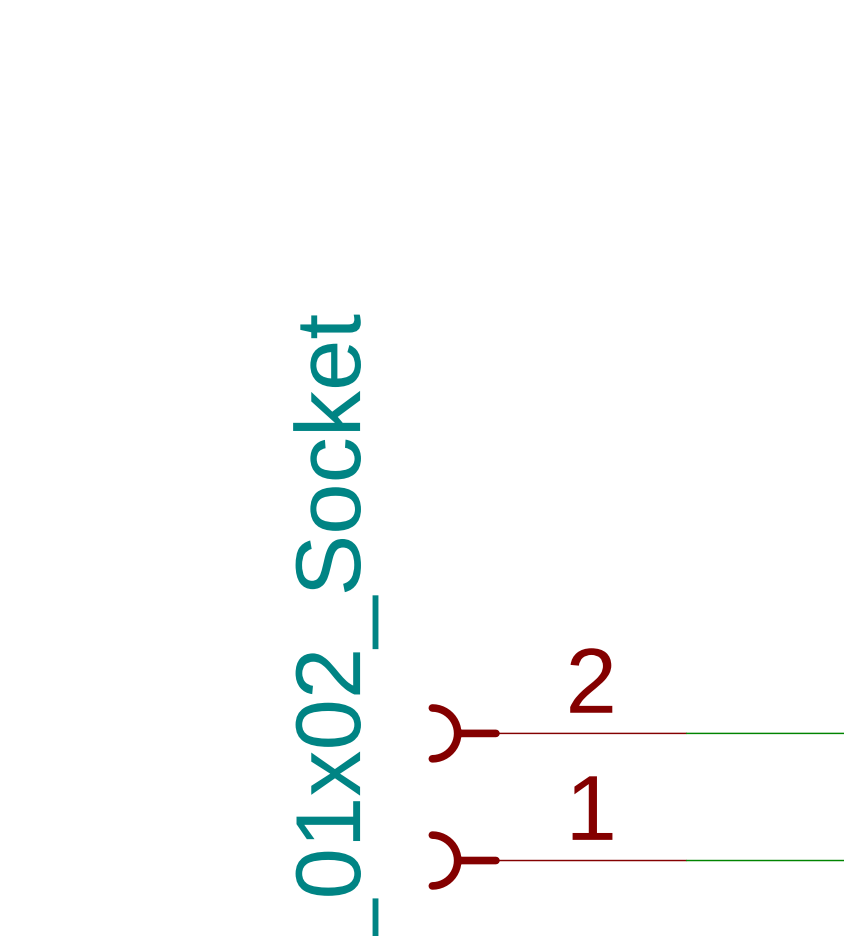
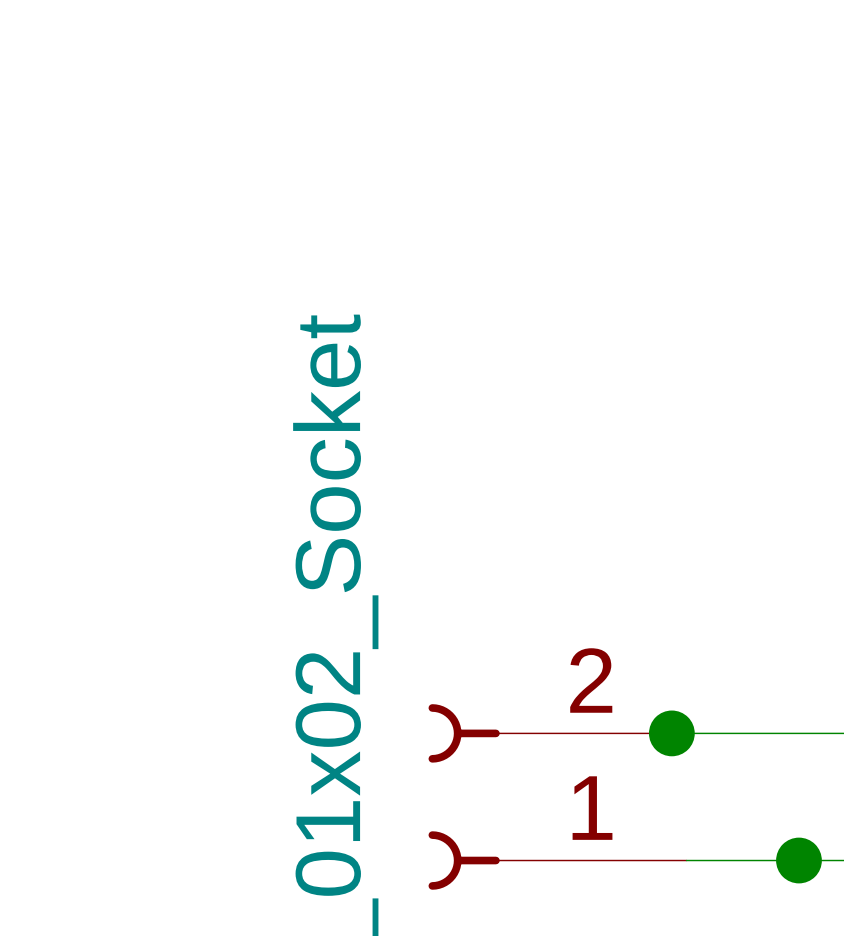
junction: none -> (671, 733)
junction: none -> (798, 860)

